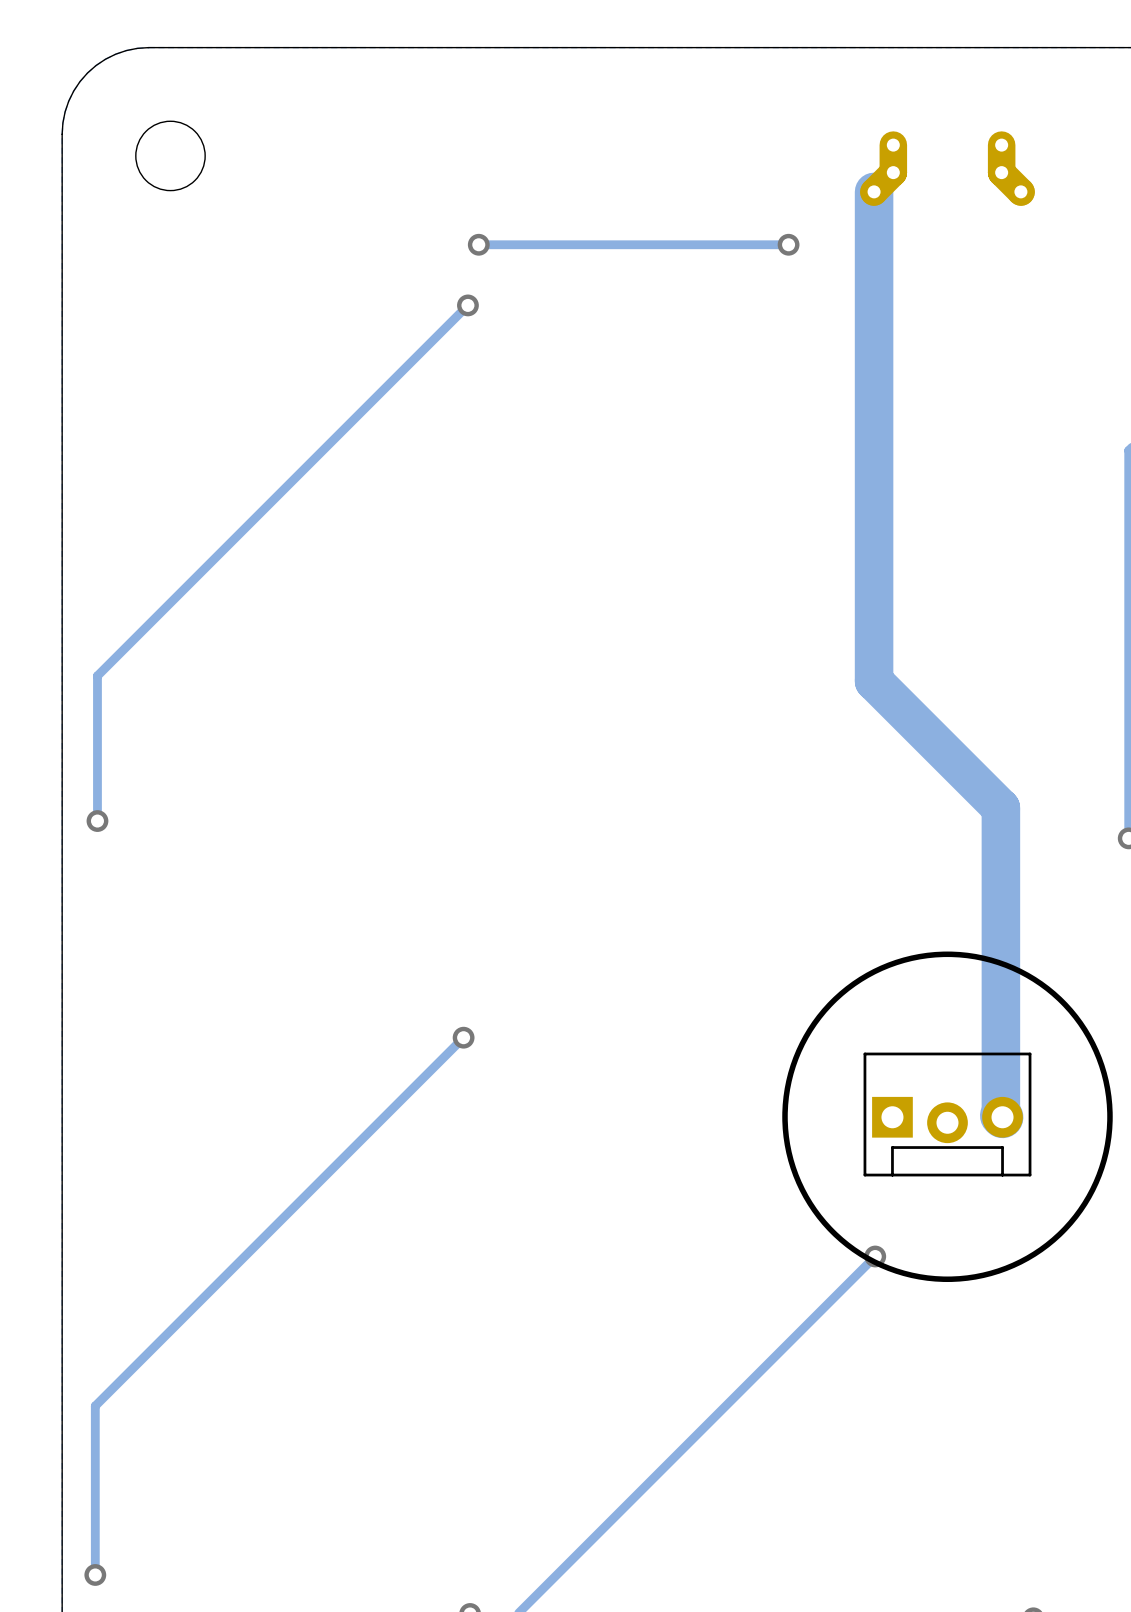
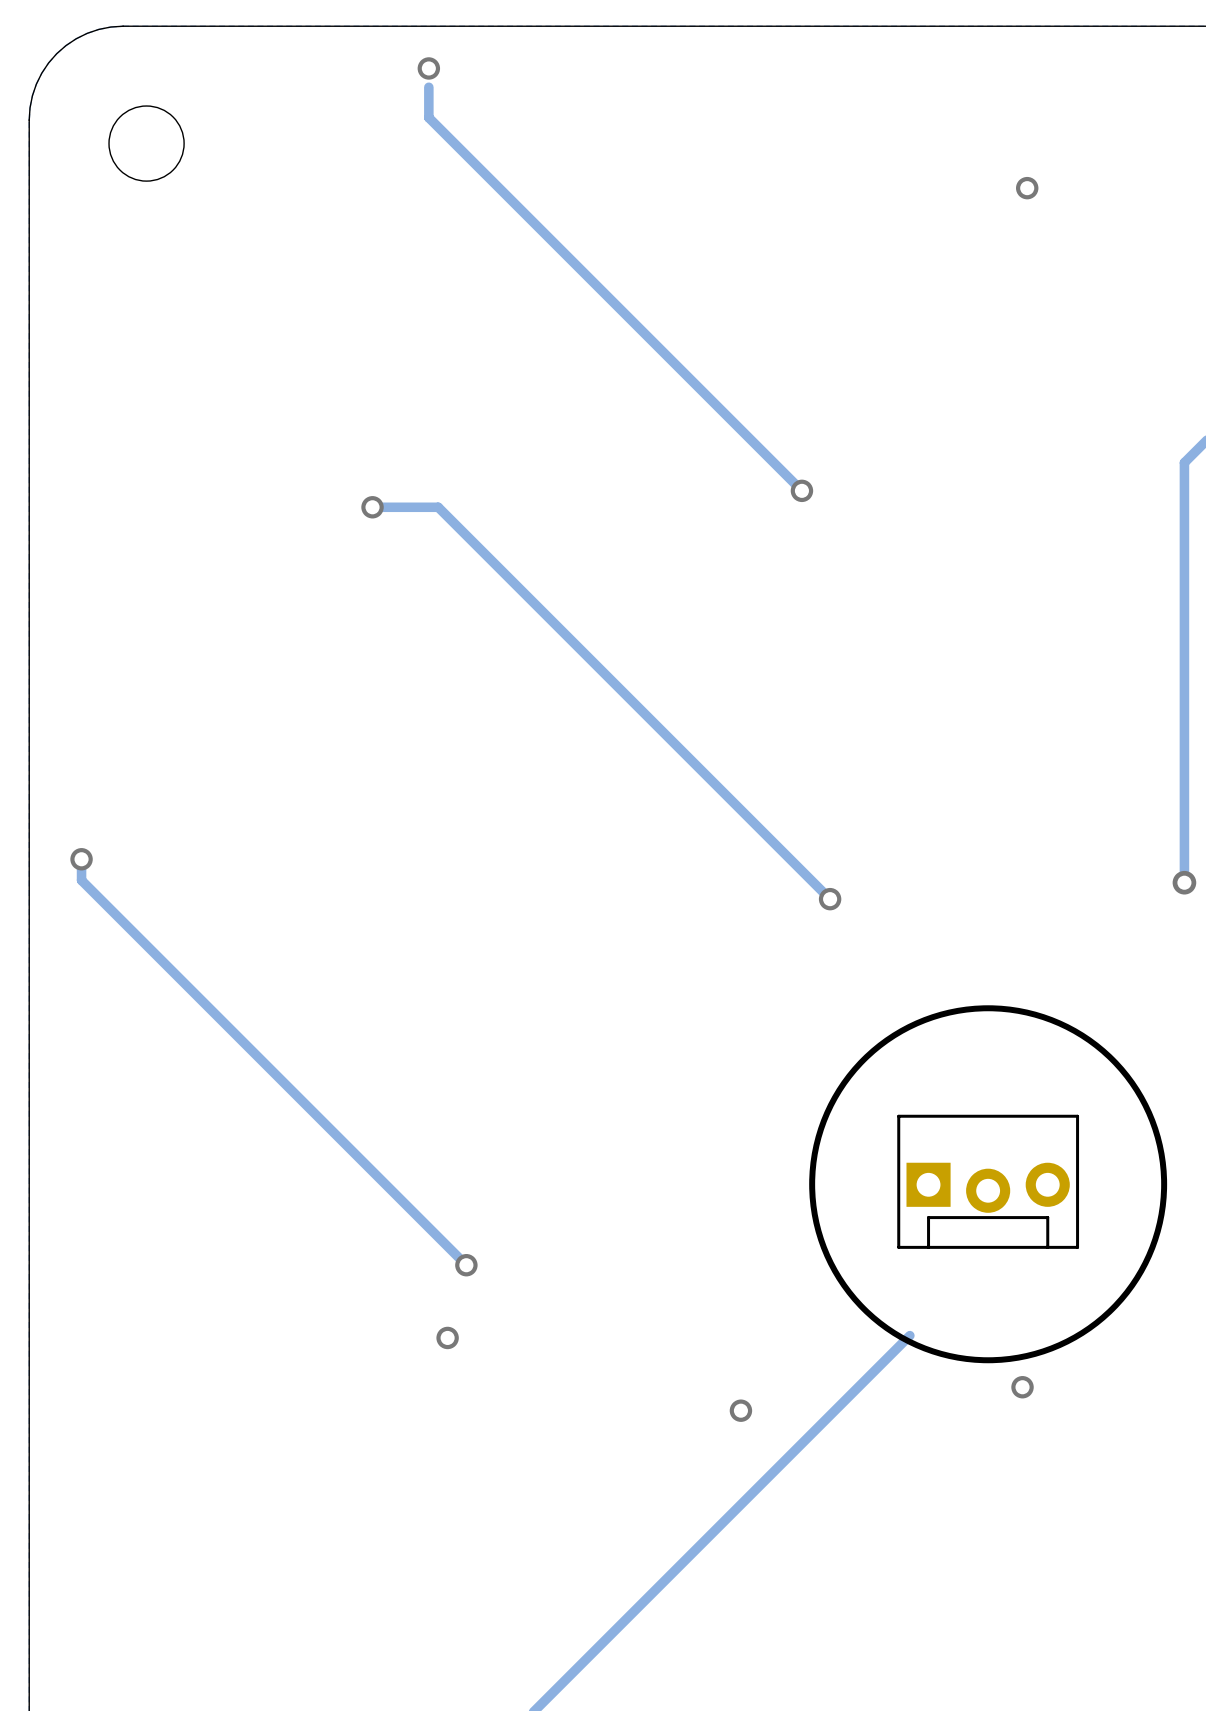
via: none -> (428, 68)
track: none -> (428, 87) (428, 117) (801, 490)
part: (883, 168) -> none
part: (1011, 168) -> none
track: (874, 191) (874, 681) (1000, 808) (1000, 1115) (1002, 1117) -> none
via: none -> (1027, 188)
via: (478, 244) -> none
track: (788, 244) (478, 244) -> none
via: (788, 244) -> none
track: (467, 305) (97, 675) (97, 821) -> none
via: (467, 305) -> none
via: none -> (801, 490)
track: none -> (372, 507) (438, 507) (830, 899)
via: none -> (372, 507)
track: none -> (81, 859) (81, 880) (466, 1265)
via position: (97, 821) -> (81, 859)
via: none -> (830, 899)
track: (463, 1037) (95, 1405) (95, 1574) -> none
via: (463, 1037) -> none
via: none -> (466, 1265)
via: (875, 1256) -> none
via: none -> (447, 1337)
via: none -> (1022, 1387)
via: none -> (740, 1410)
via: (95, 1574) -> none

